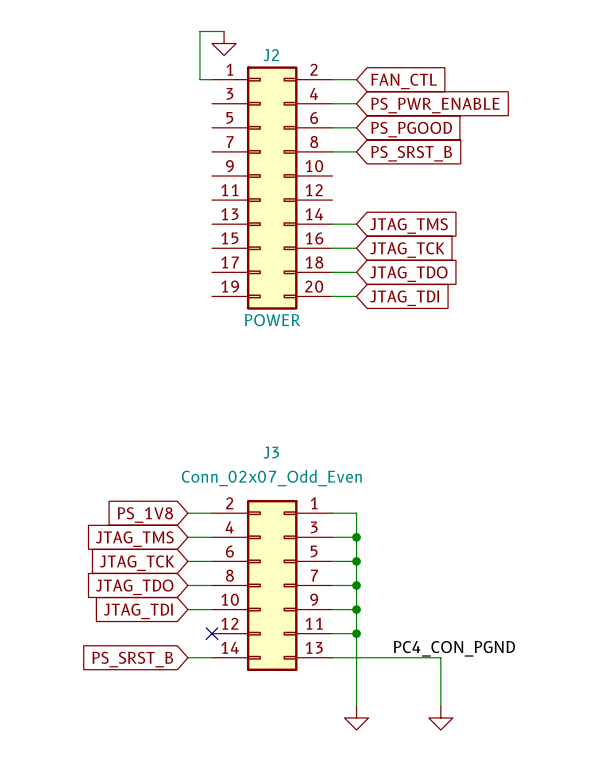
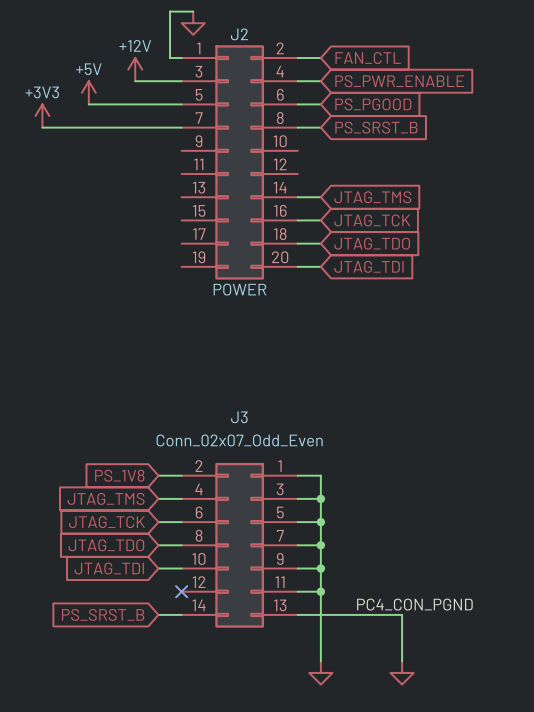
power symbol: none -> +12V (135, 69)
wire: none -> (135, 81) (181, 81)
power symbol: none -> +5V (88, 92)
wire: none -> (88, 104) (181, 104)
power symbol: none -> +3V3 (42, 116)
wire: none -> (42, 127) (181, 127)

